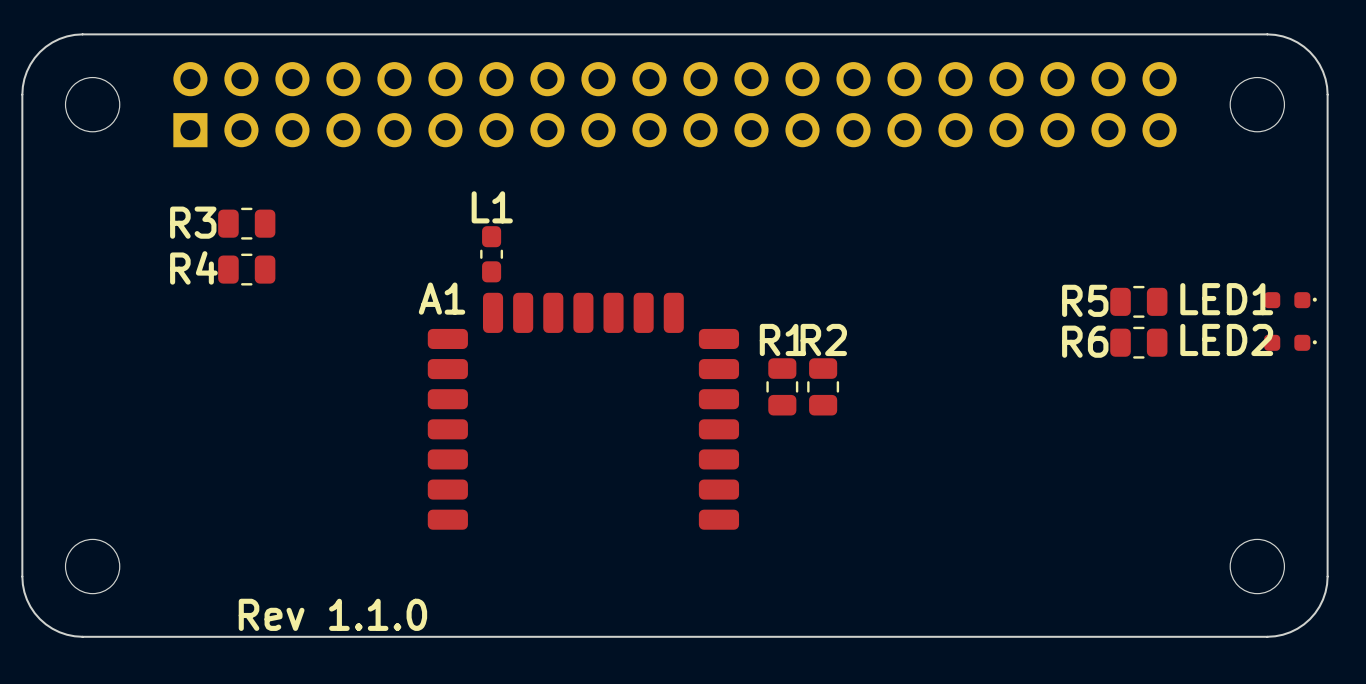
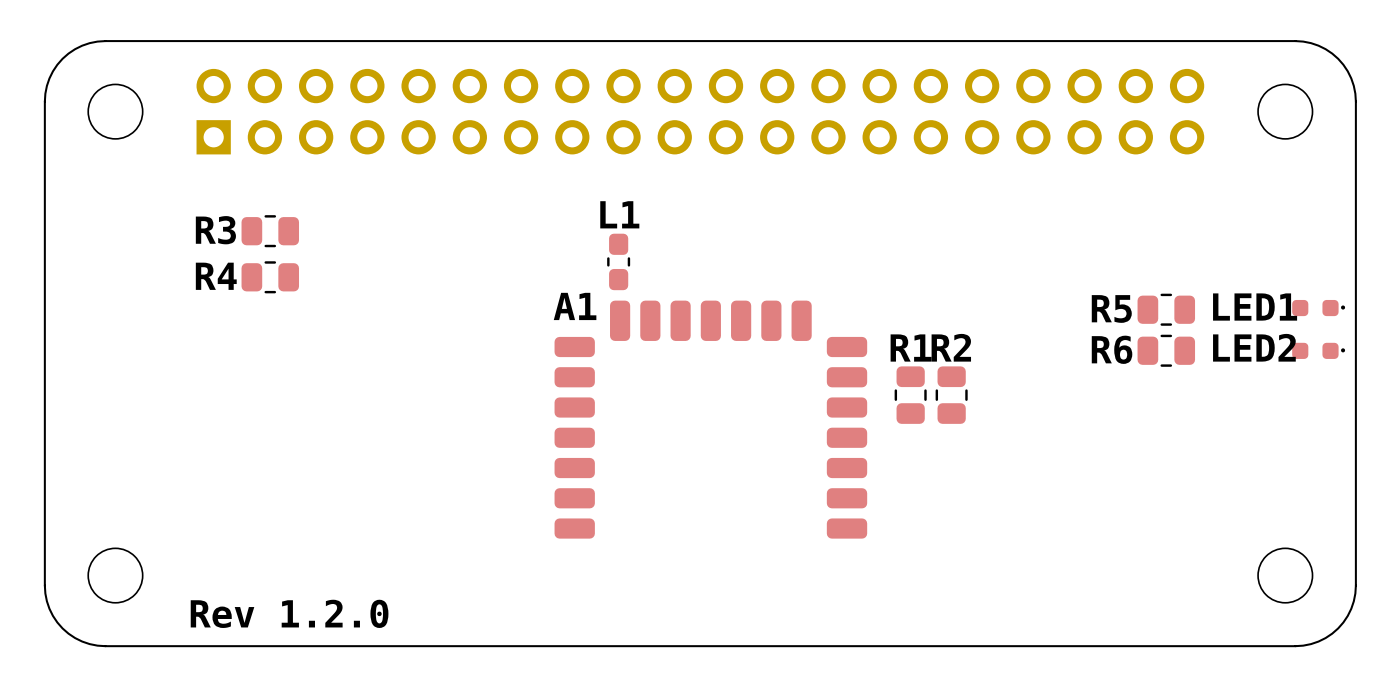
L1 position: (491, 254) -> (618, 261)
R1 position: (782, 386) -> (910, 395)
R2 position: (823, 386) -> (951, 395)
A1 position: (583, 411) -> (710, 419)
text: Rev 1.1.0 (332, 614) -> Rev 1.2.0 (289, 613)

